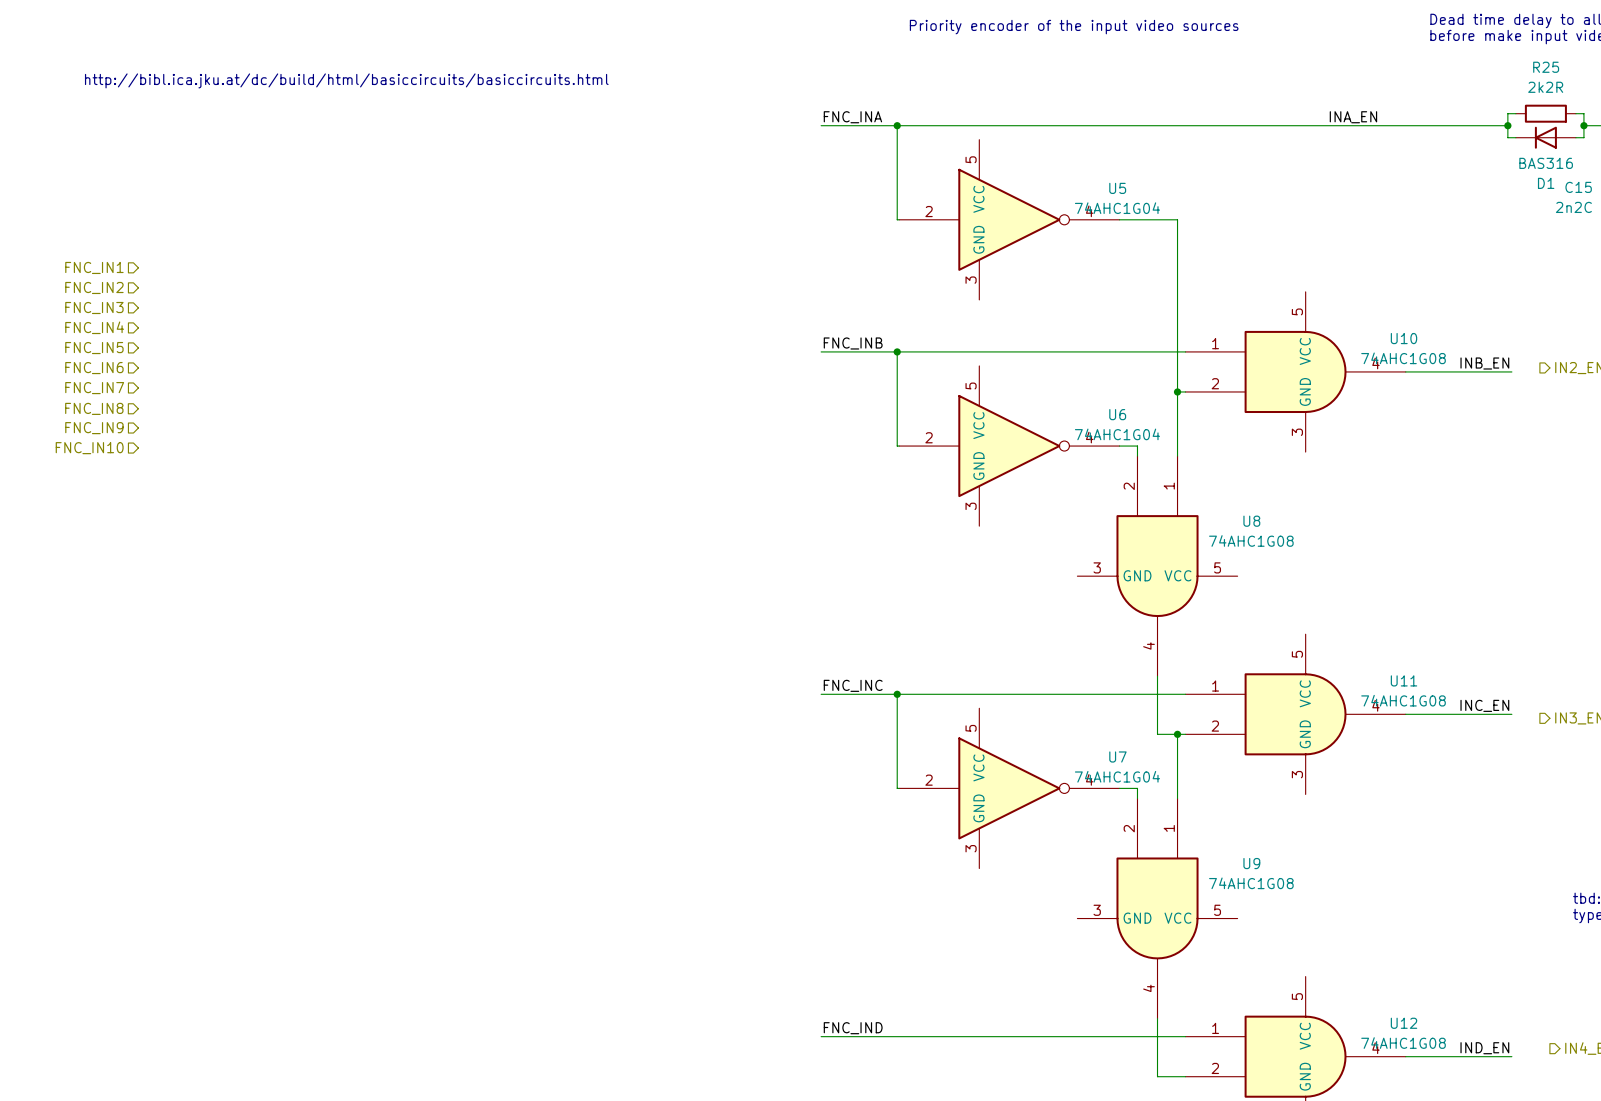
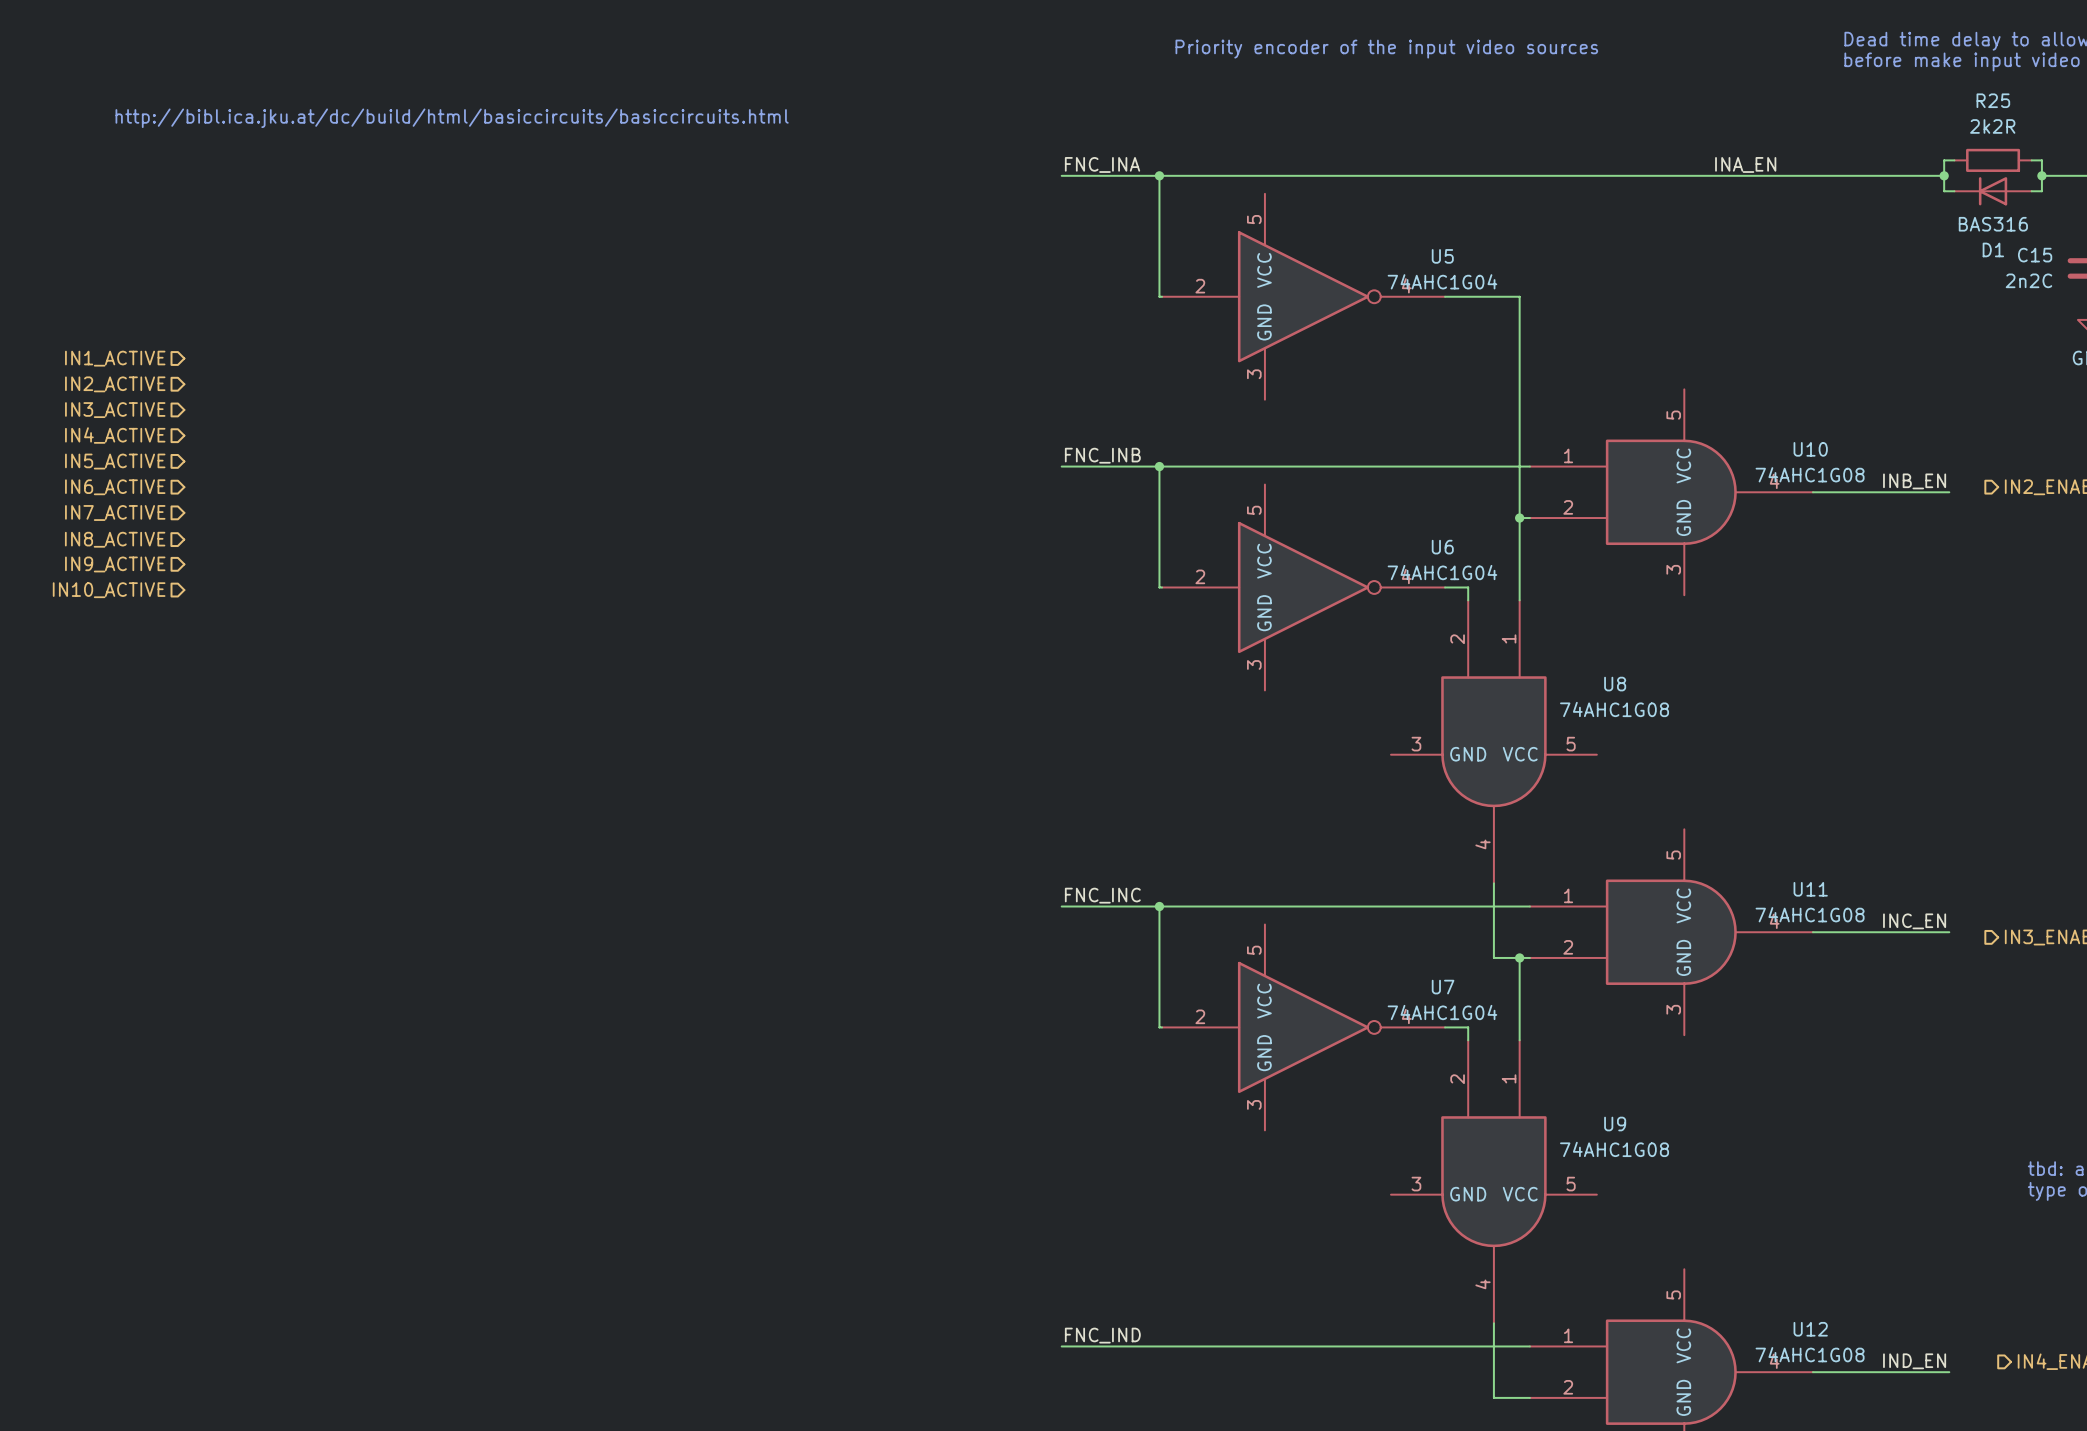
hierarchical label: FNC_IN1 (94, 267) -> IN1_ACTIVE (115, 358)
hierarchical label: FNC_IN2 (94, 287) -> IN2_ACTIVE (115, 384)
hierarchical label: FNC_IN3 (94, 308) -> IN3_ACTIVE (115, 410)
hierarchical label: FNC_IN4 (94, 327) -> IN4_ACTIVE (115, 435)
hierarchical label: FNC_IN5 (94, 348) -> IN5_ACTIVE (115, 461)
hierarchical label: FNC_IN6 (94, 368) -> IN6_ACTIVE (115, 487)
hierarchical label: FNC_IN7 (94, 388) -> IN7_ACTIVE (115, 513)
hierarchical label: FNC_IN8 (94, 408) -> IN8_ACTIVE (115, 539)
hierarchical label: FNC_IN9 (94, 428) -> IN9_ACTIVE (115, 564)
hierarchical label: FNC_IN10 (89, 448) -> IN10_ACTIVE (109, 590)

